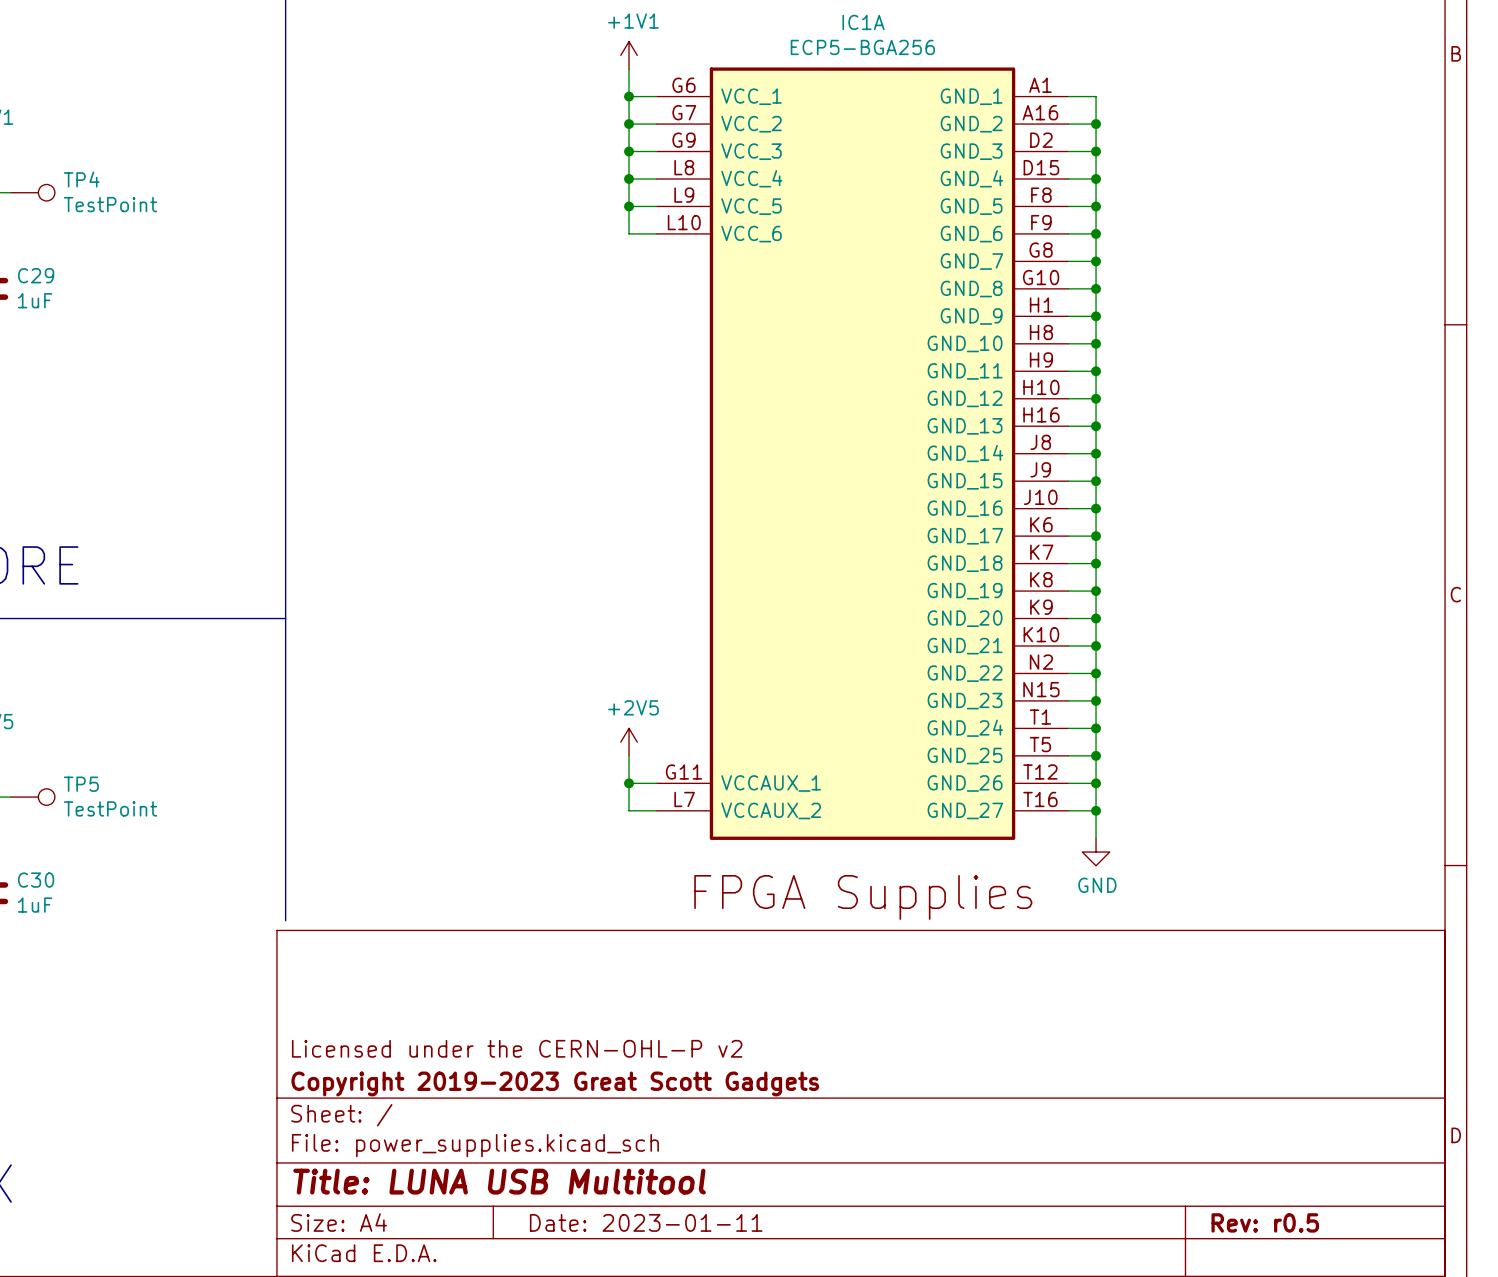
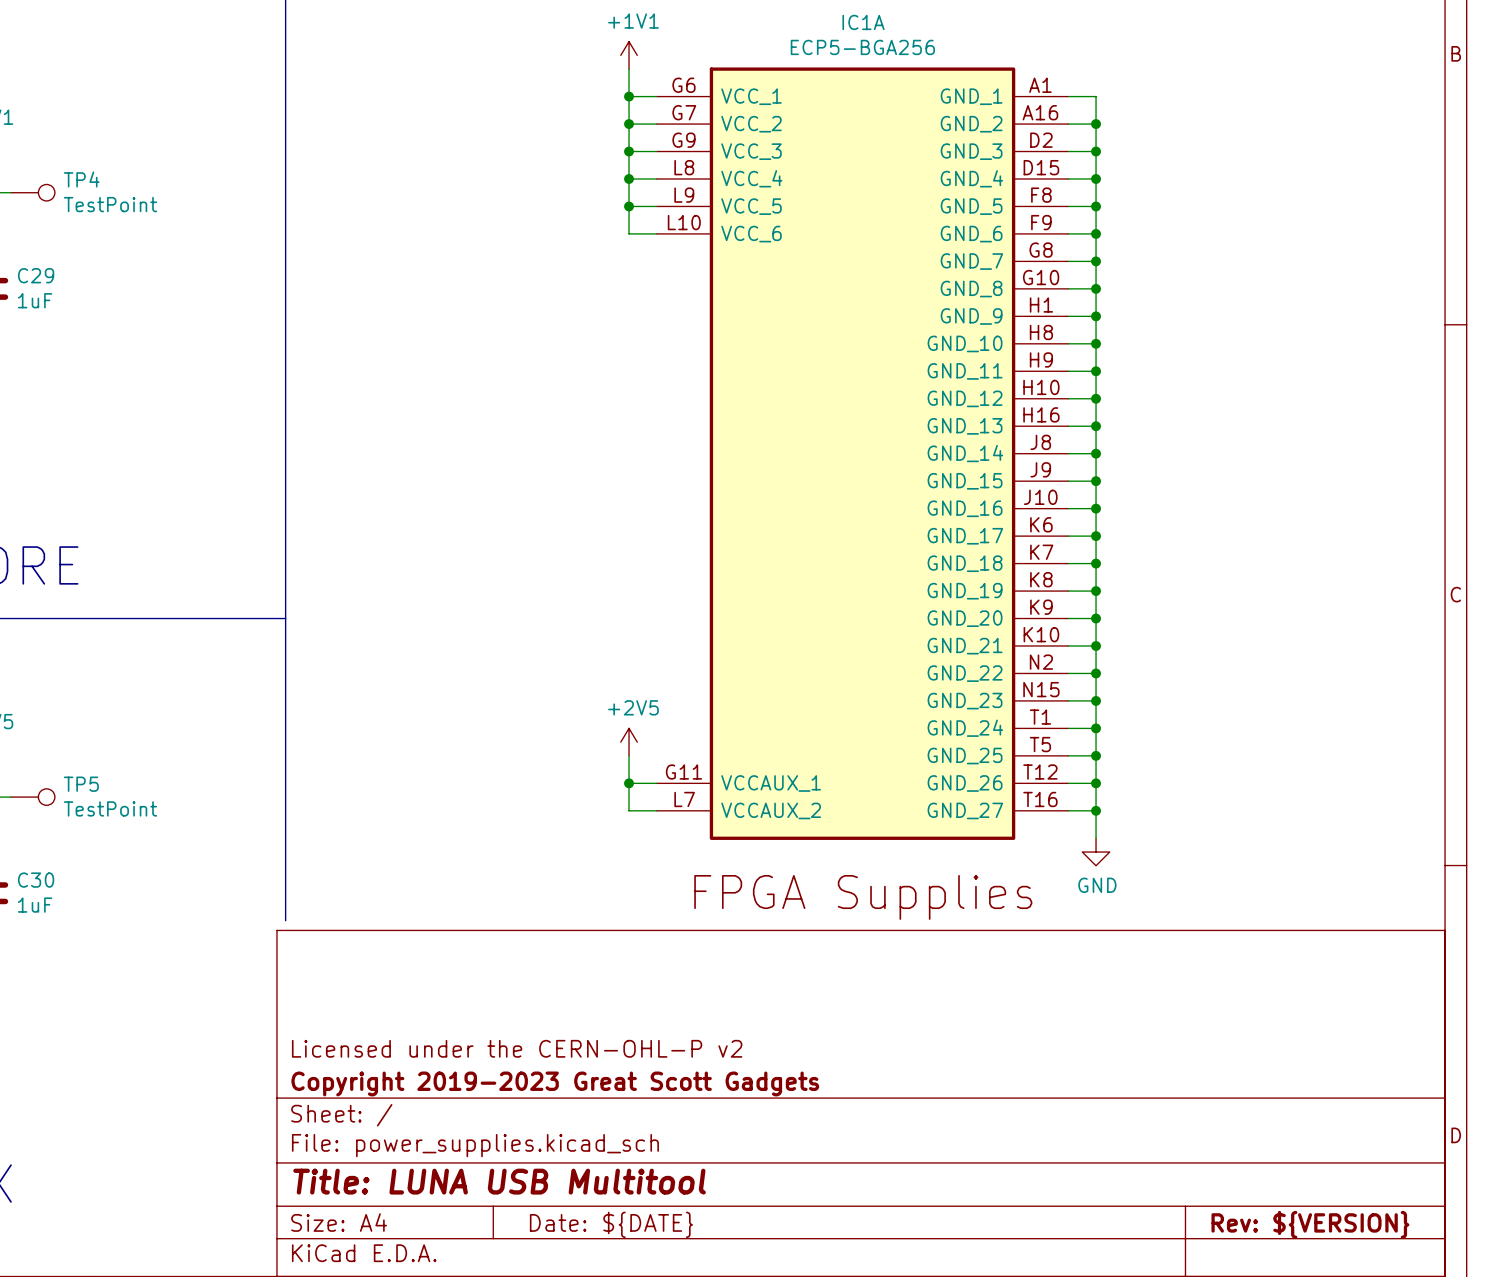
title block: Date: 2023-01-11 (646, 1222) -> Date: ${DATE} (611, 1224)
title block: Rev: r0.5 (1265, 1222) -> Rev: ${VERSION} (1310, 1224)

